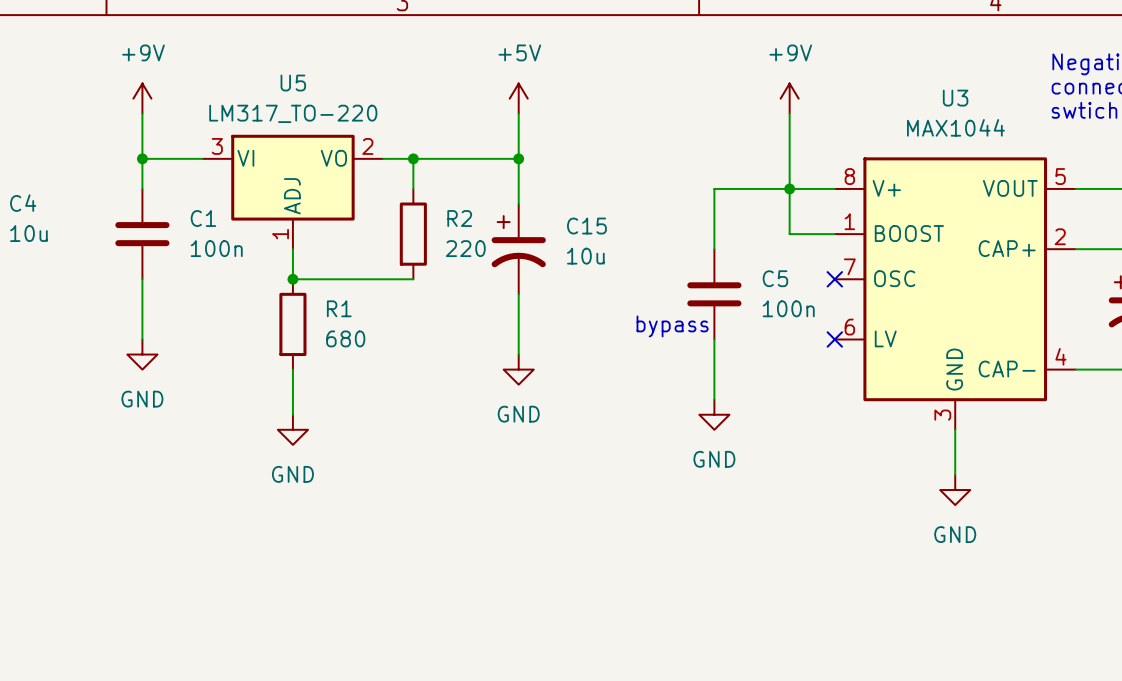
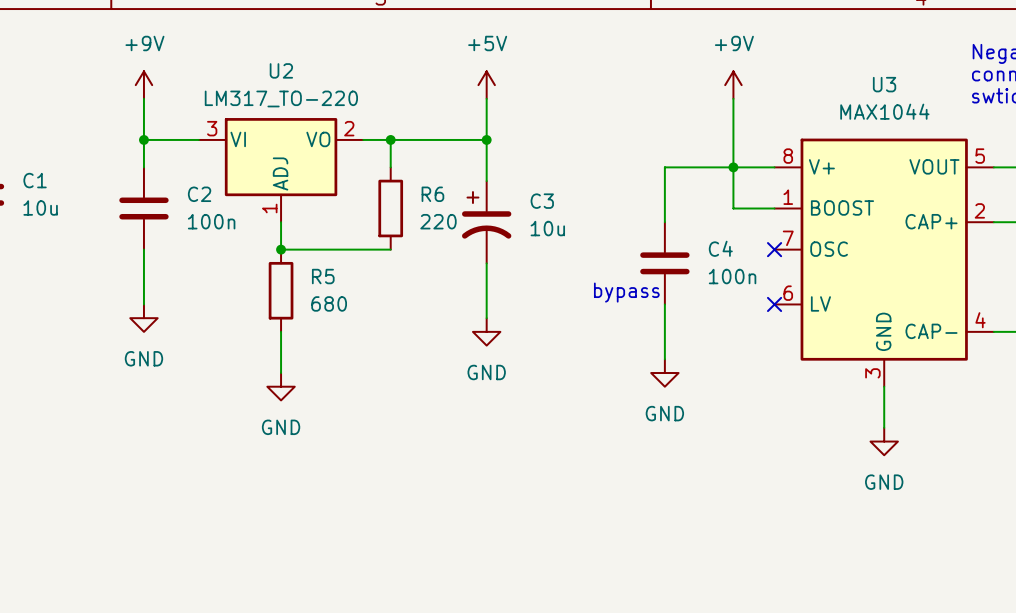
U5 name: U5 (293, 83) -> U2 (281, 70)
C4 name: C4 (23, 203) -> C1 (35, 180)
C1 name: C1 (203, 218) -> C2 (199, 194)
R2 name: R2 (459, 218) -> R6 (432, 194)
C15 name: C15 (586, 226) -> C3 (542, 201)
C5 name: C5 (775, 278) -> C4 (720, 248)
R1 name: R1 (339, 308) -> R5 (323, 276)

